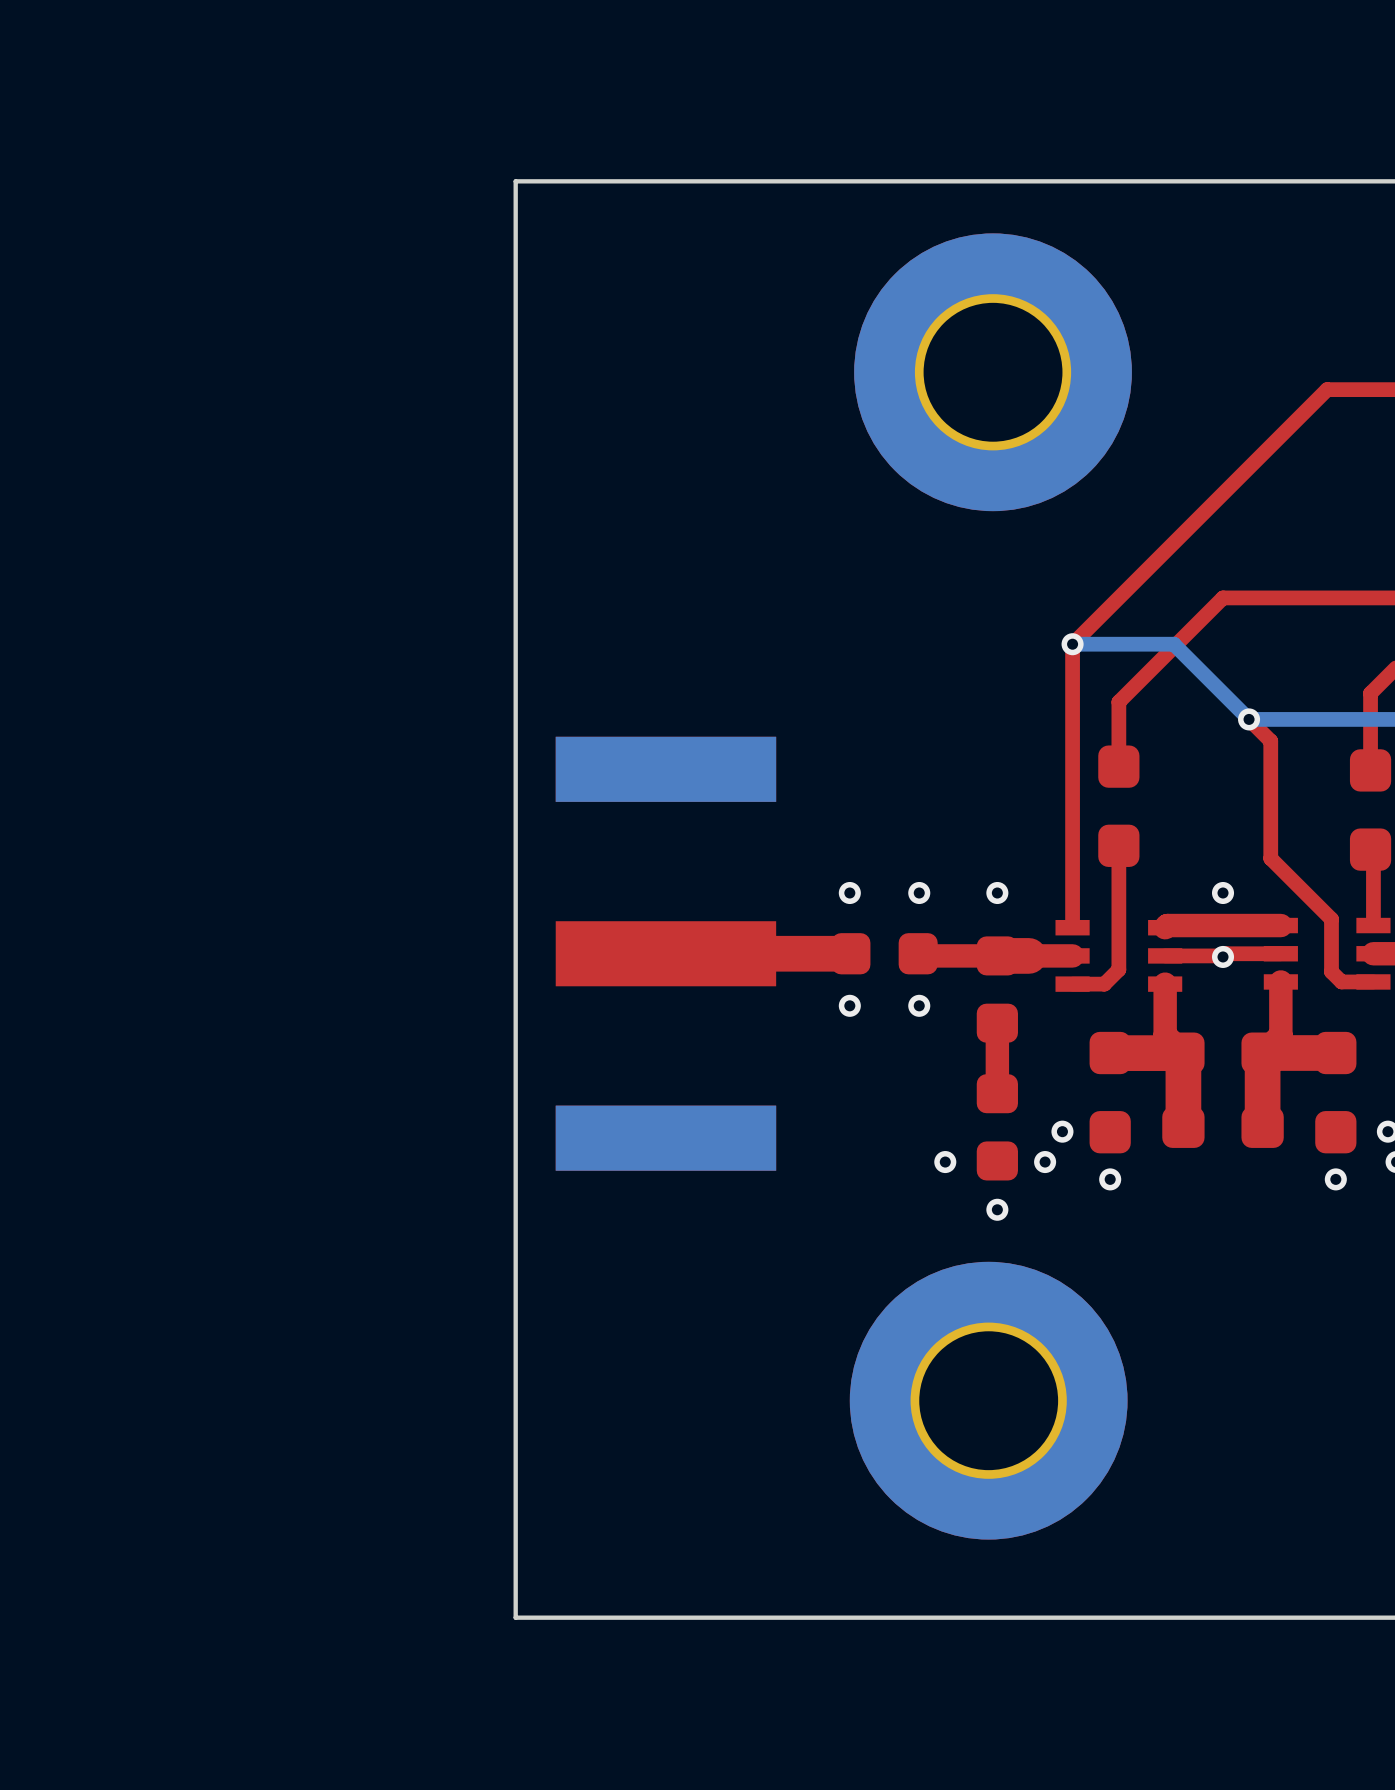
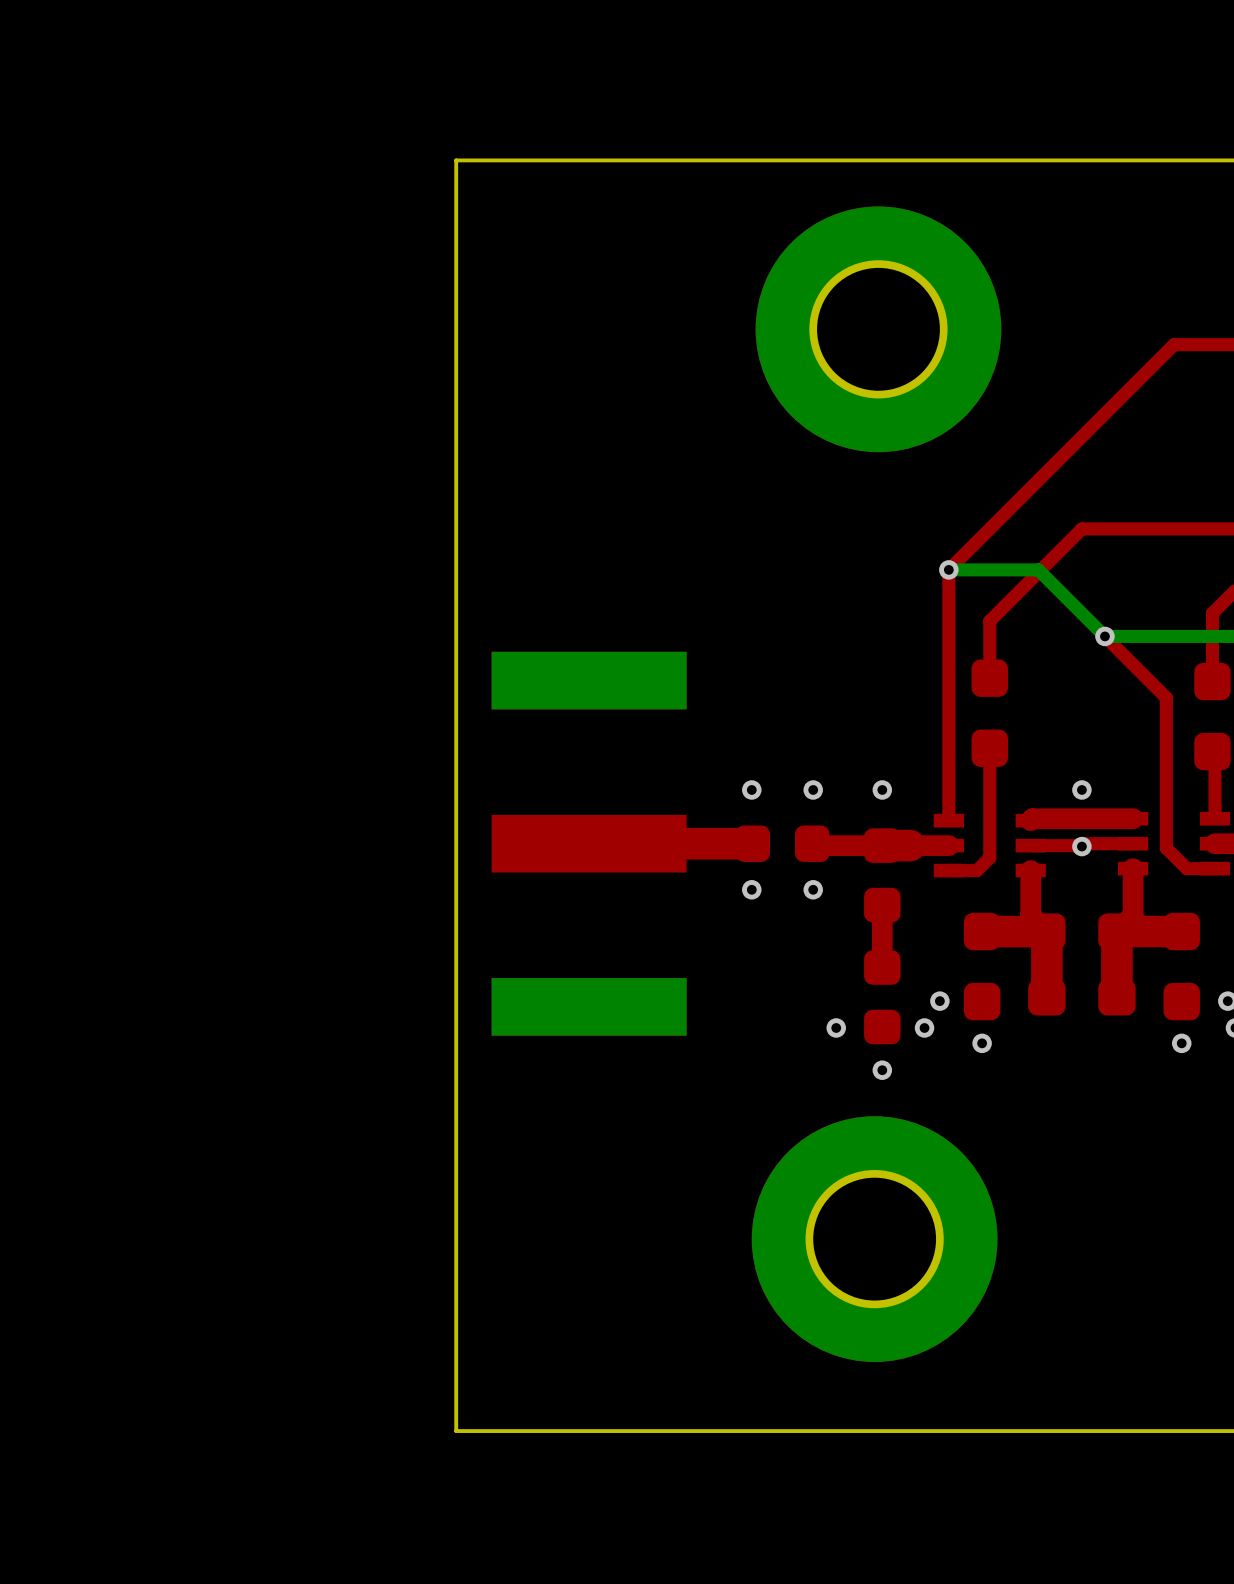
top track: (1270, 741) (1270, 858) (1331, 919) (1331, 971) -> (1124, 655) (1166, 697) (1166, 848) (1177, 859)

